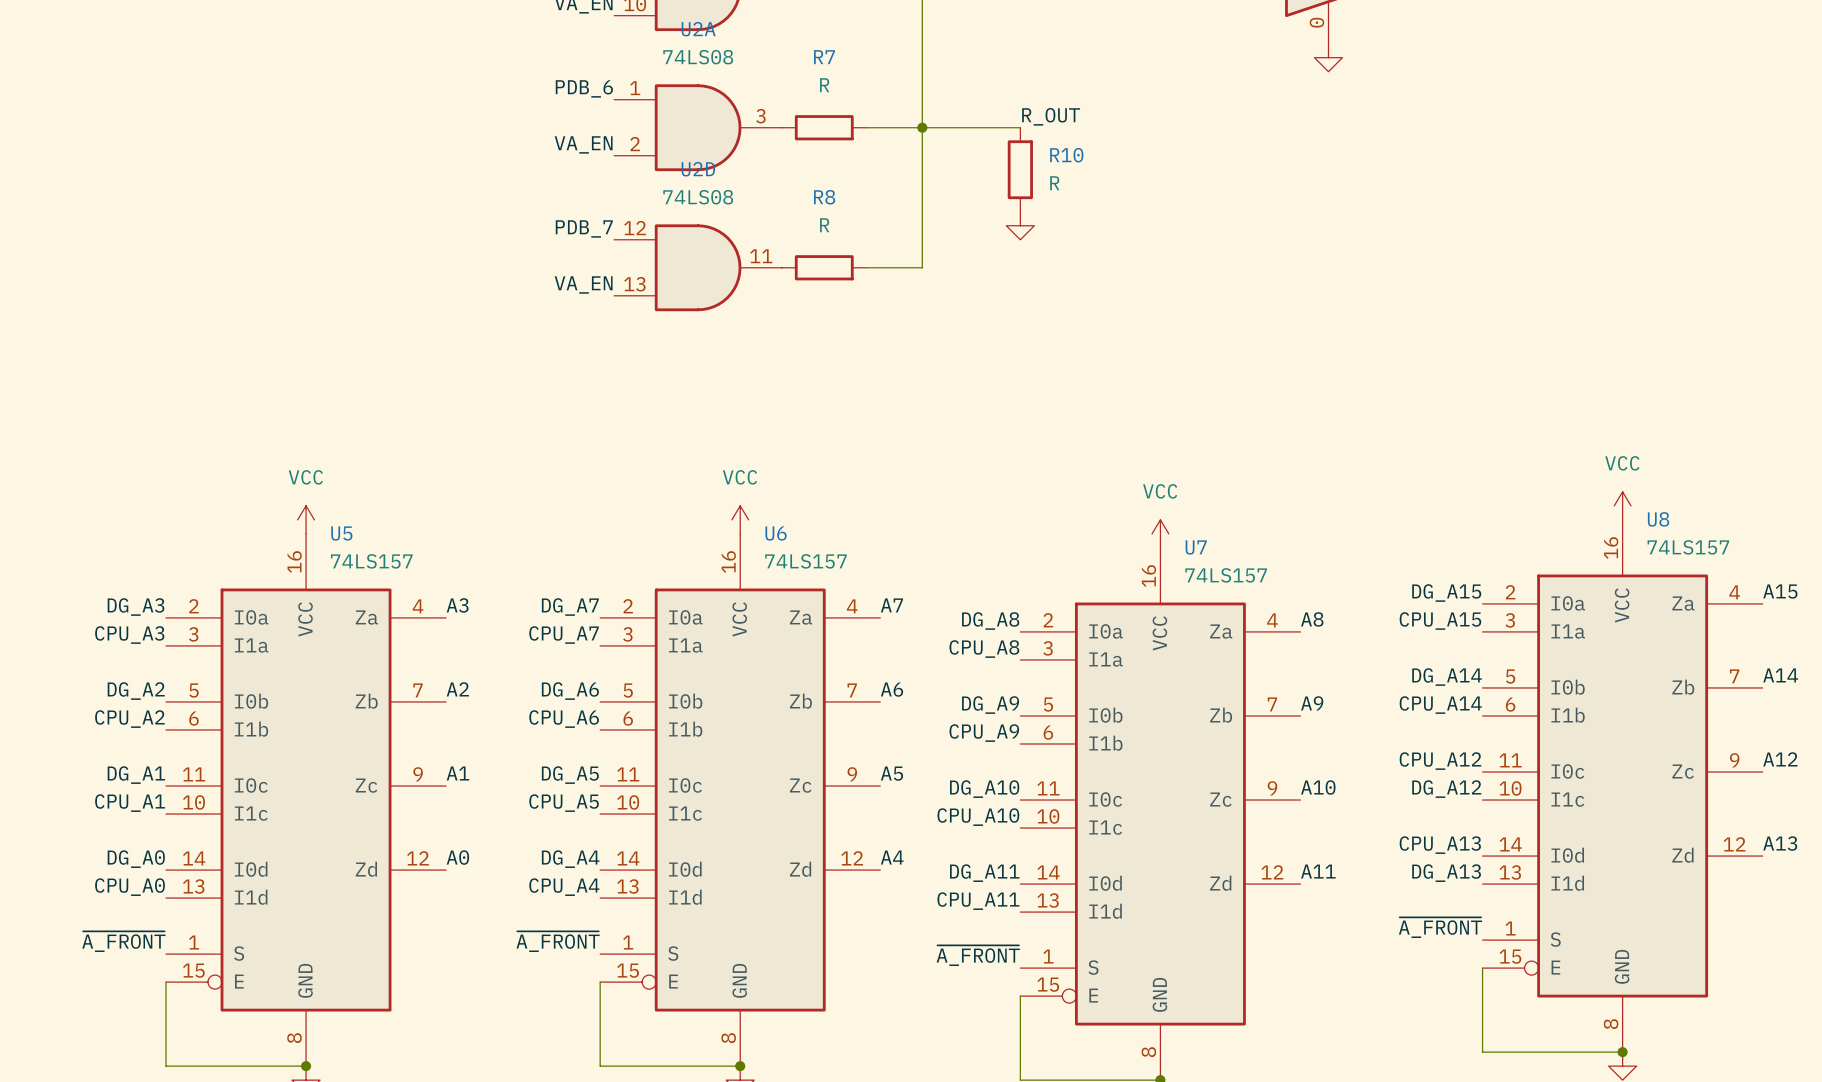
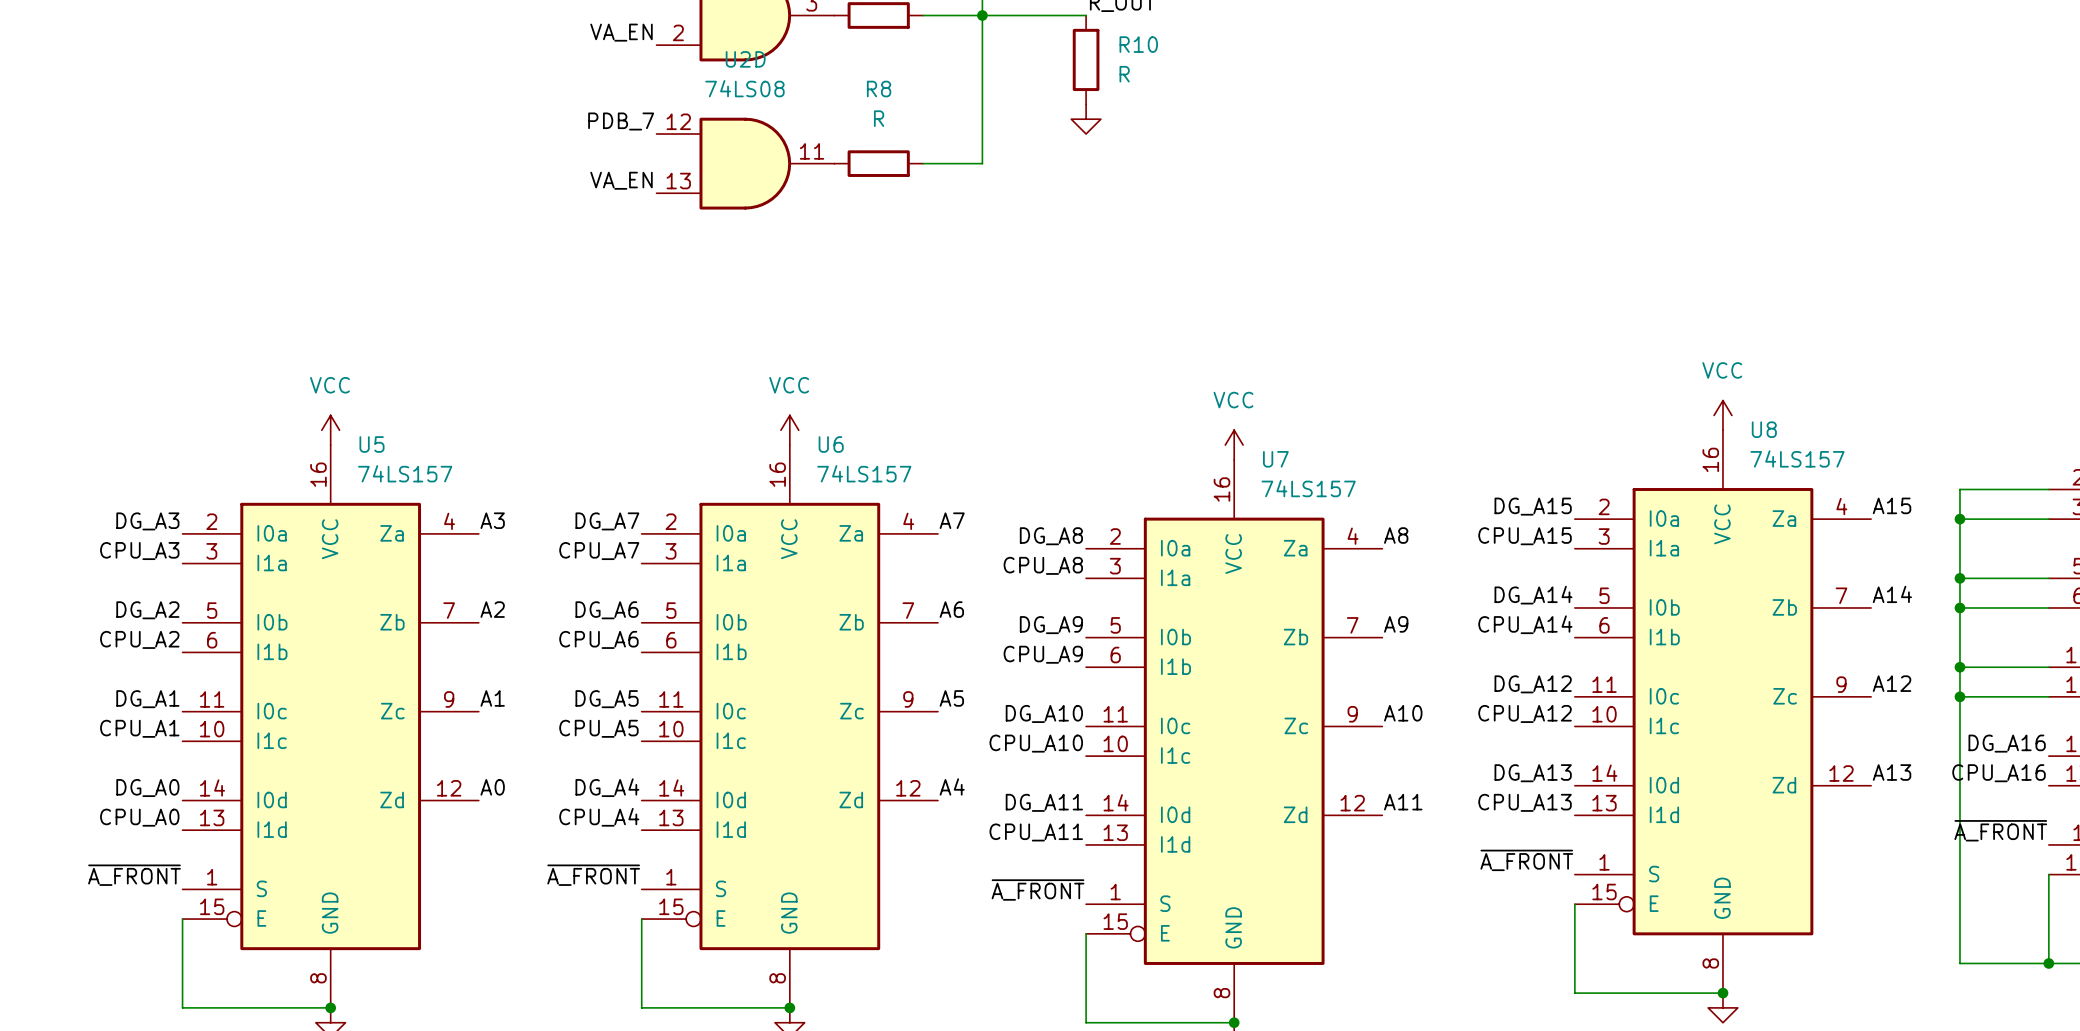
label: CPU_A12 (1440, 761) -> DG_A12 (1533, 684)
label: DG_A12 (1446, 789) -> CPU_A12 (1525, 713)
label: CPU_A13 (1440, 845) -> DG_A13 (1533, 773)
label: DG_A13 (1446, 873) -> CPU_A13 (1525, 802)

